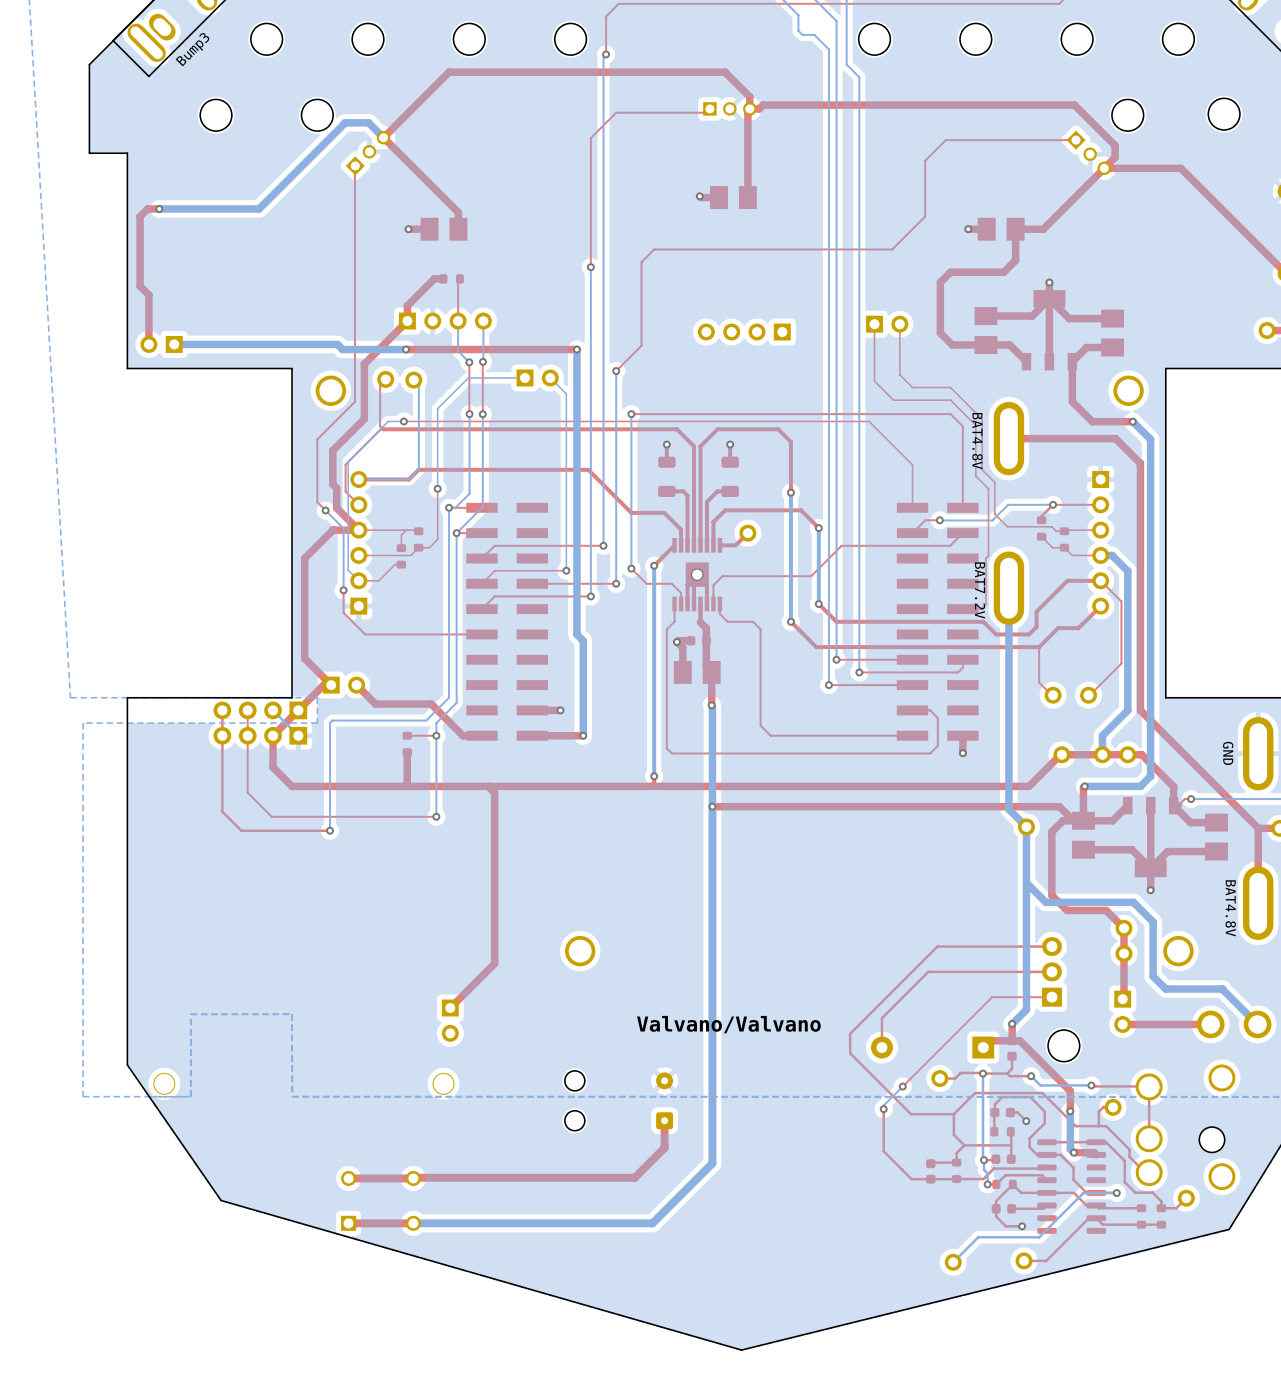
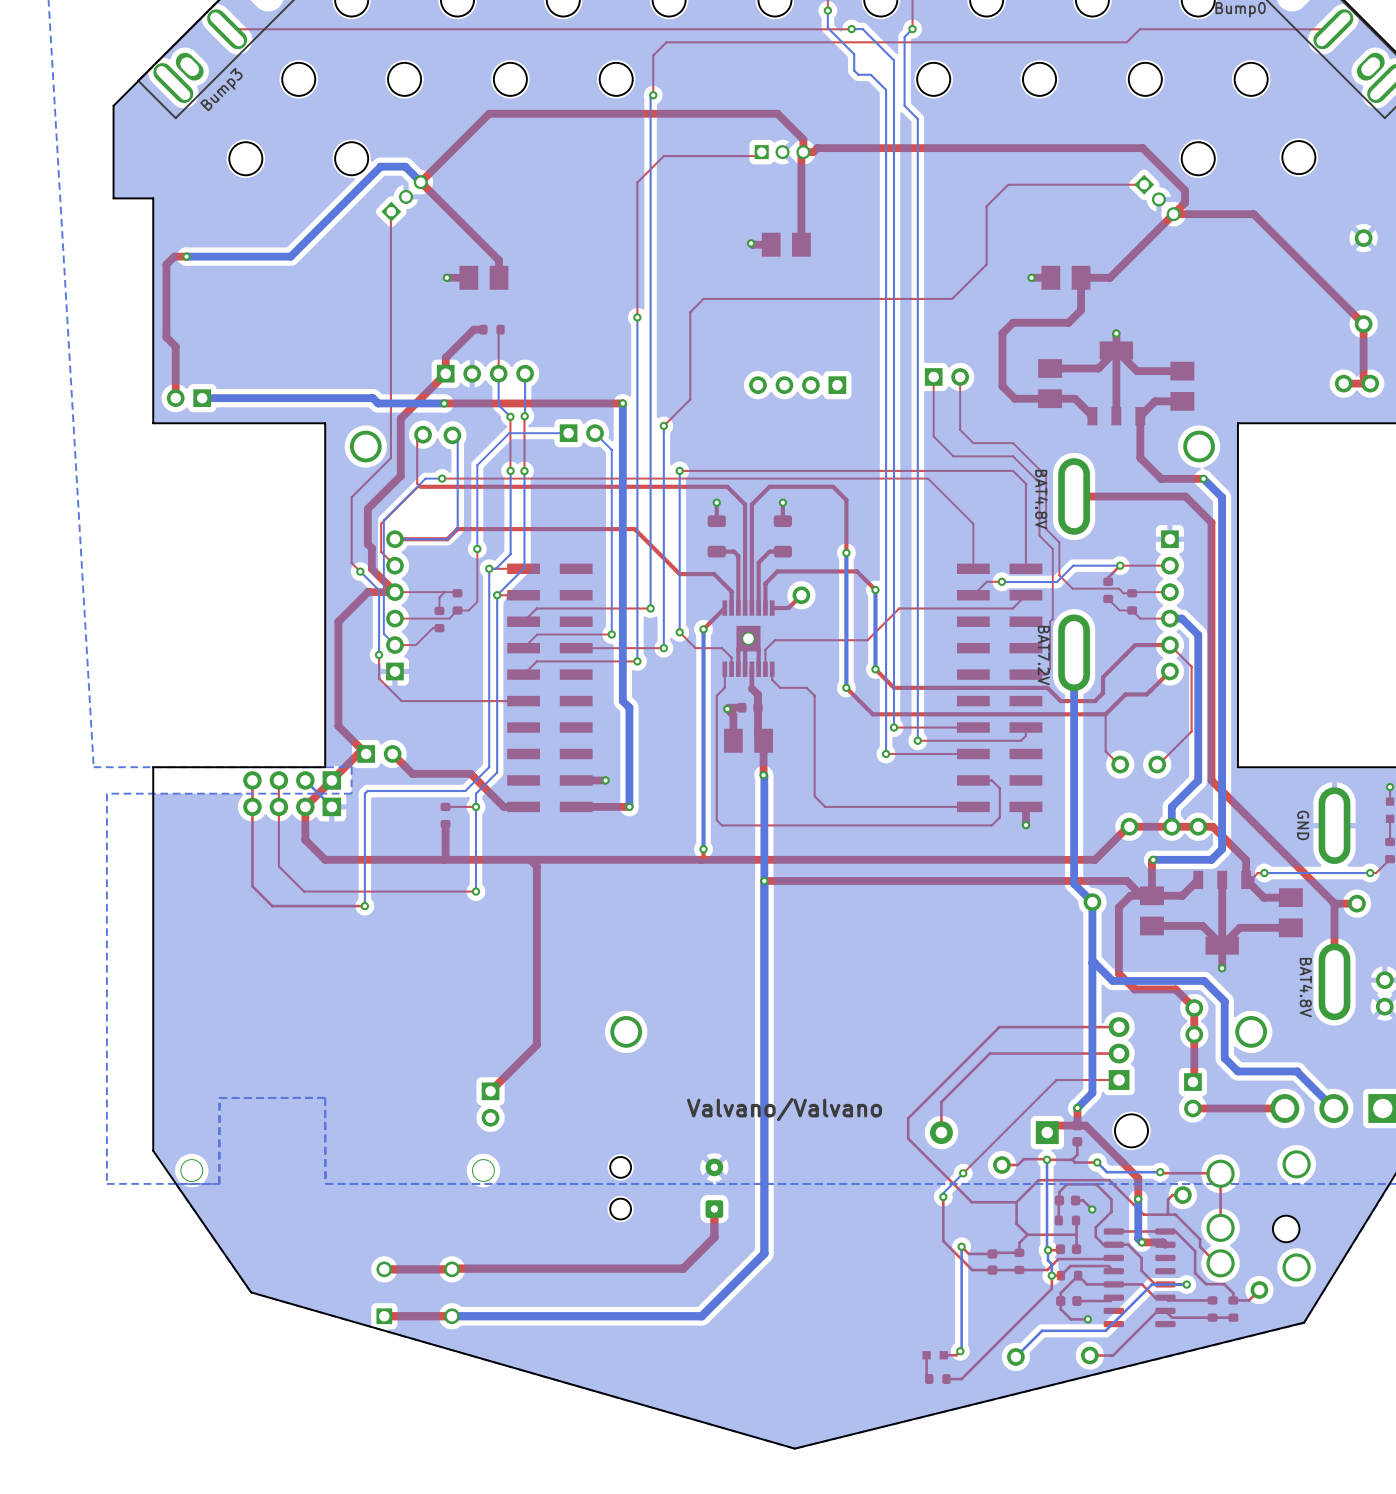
top track: none -> (961, 1246) (968, 1253) (992, 1253)
bottom track: none -> (961, 1246) (960, 1351)
via: none -> (961, 1246)
top track: none -> (1051, 1275) (1051, 1288) (961, 1379) (946, 1379)
top track: none -> (961, 1349) (956, 1355) (943, 1355)
via: none -> (960, 1351)
top track: none -> (926, 1355) (926, 1376) (929, 1379)
part: none -> (935, 1355)
part: none -> (937, 1379)

